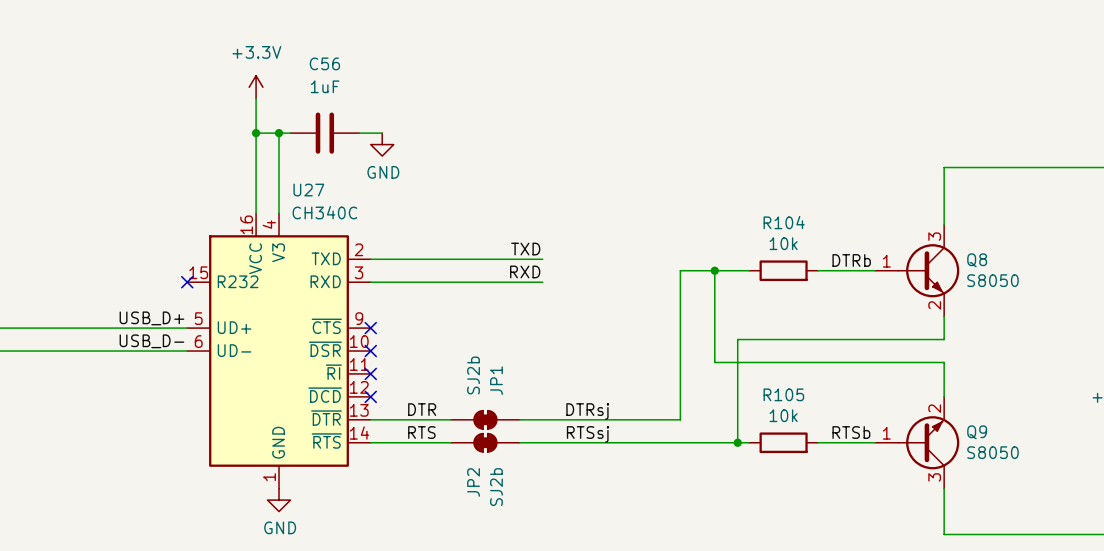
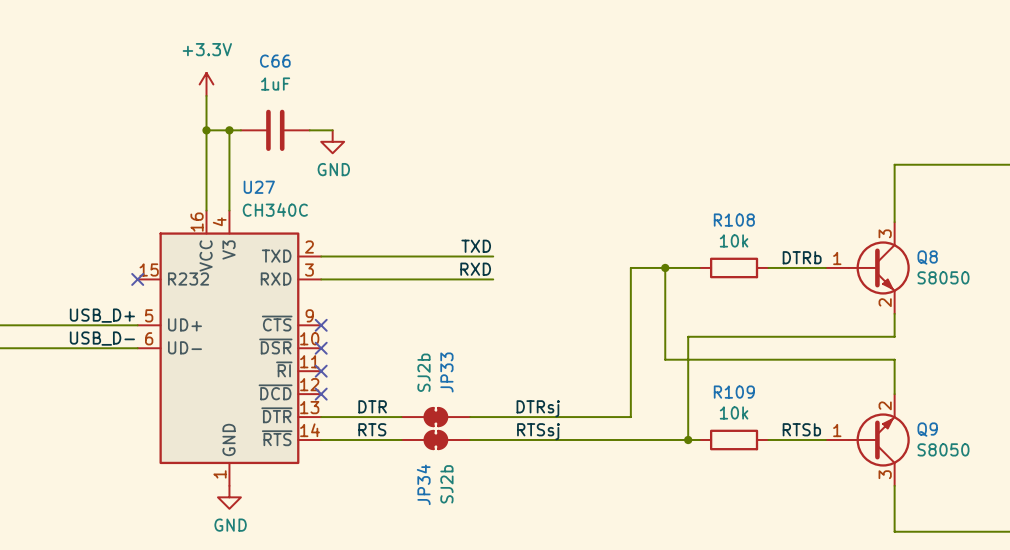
C56 name: C56 (324, 63) -> C66 (275, 61)
R104 name: R104 (784, 222) -> R108 (734, 220)
JP1 name: JP1 (496, 380) -> JP33 (446, 372)
R105 name: R105 (783, 394) -> R109 (734, 392)
JP2 name: JP2 (473, 482) -> JP34 (423, 484)

